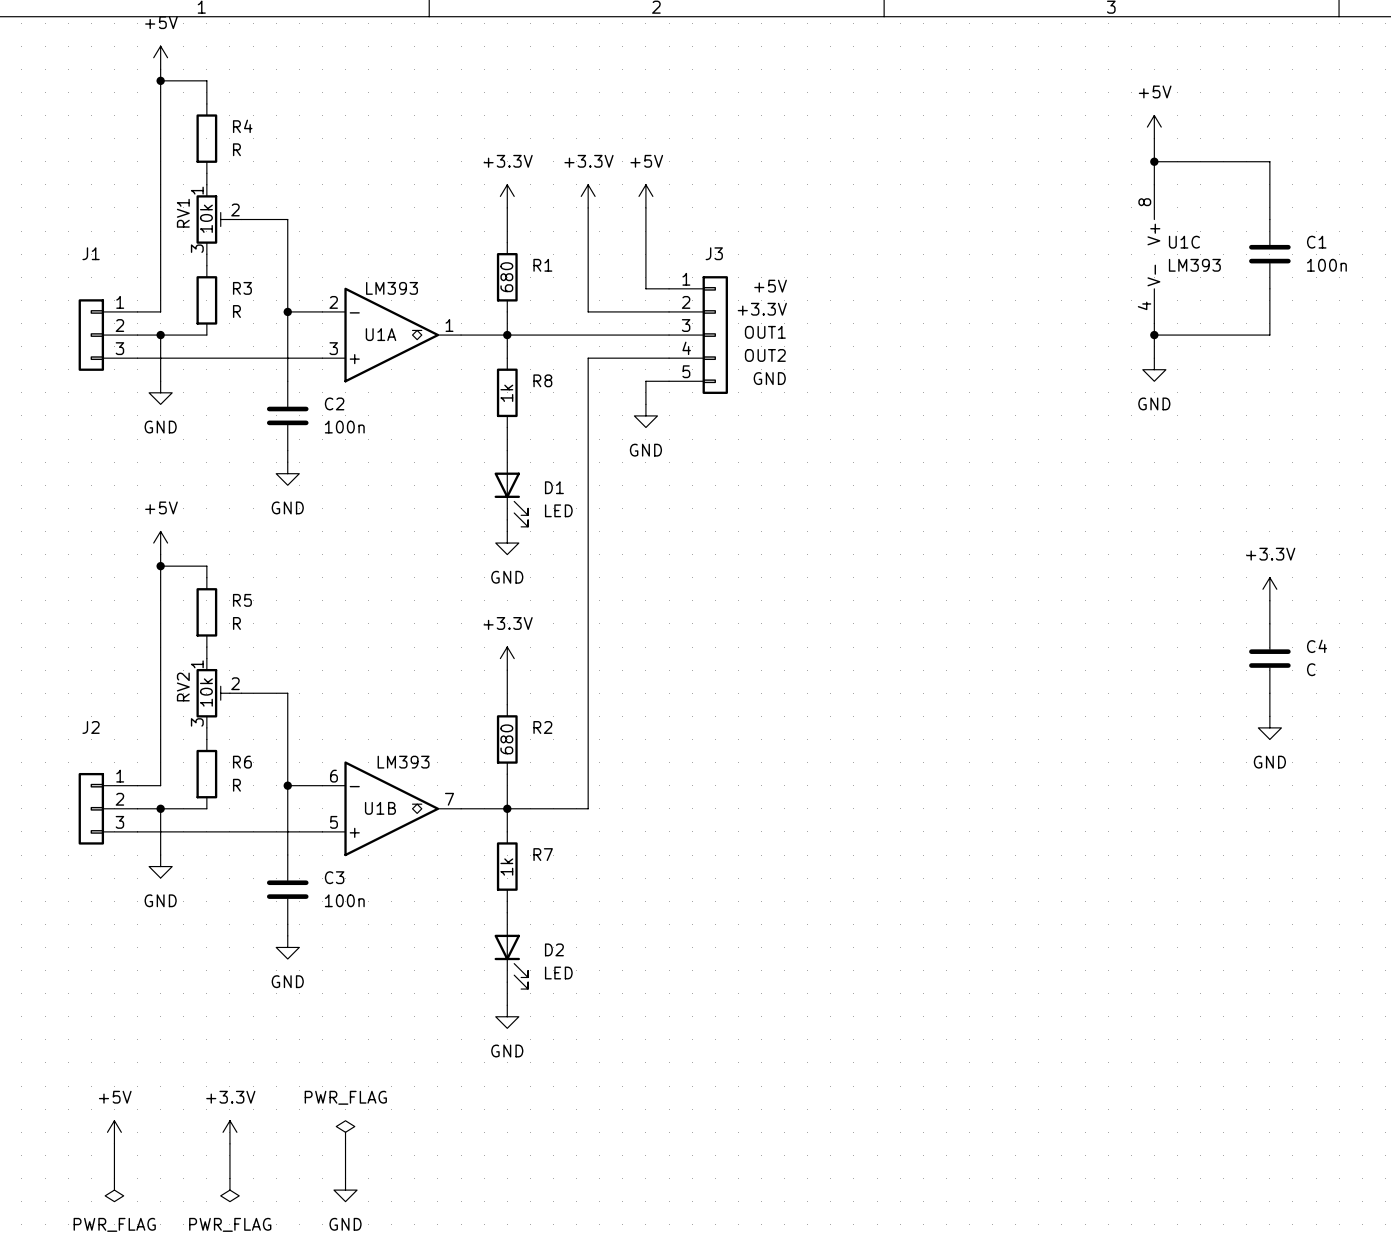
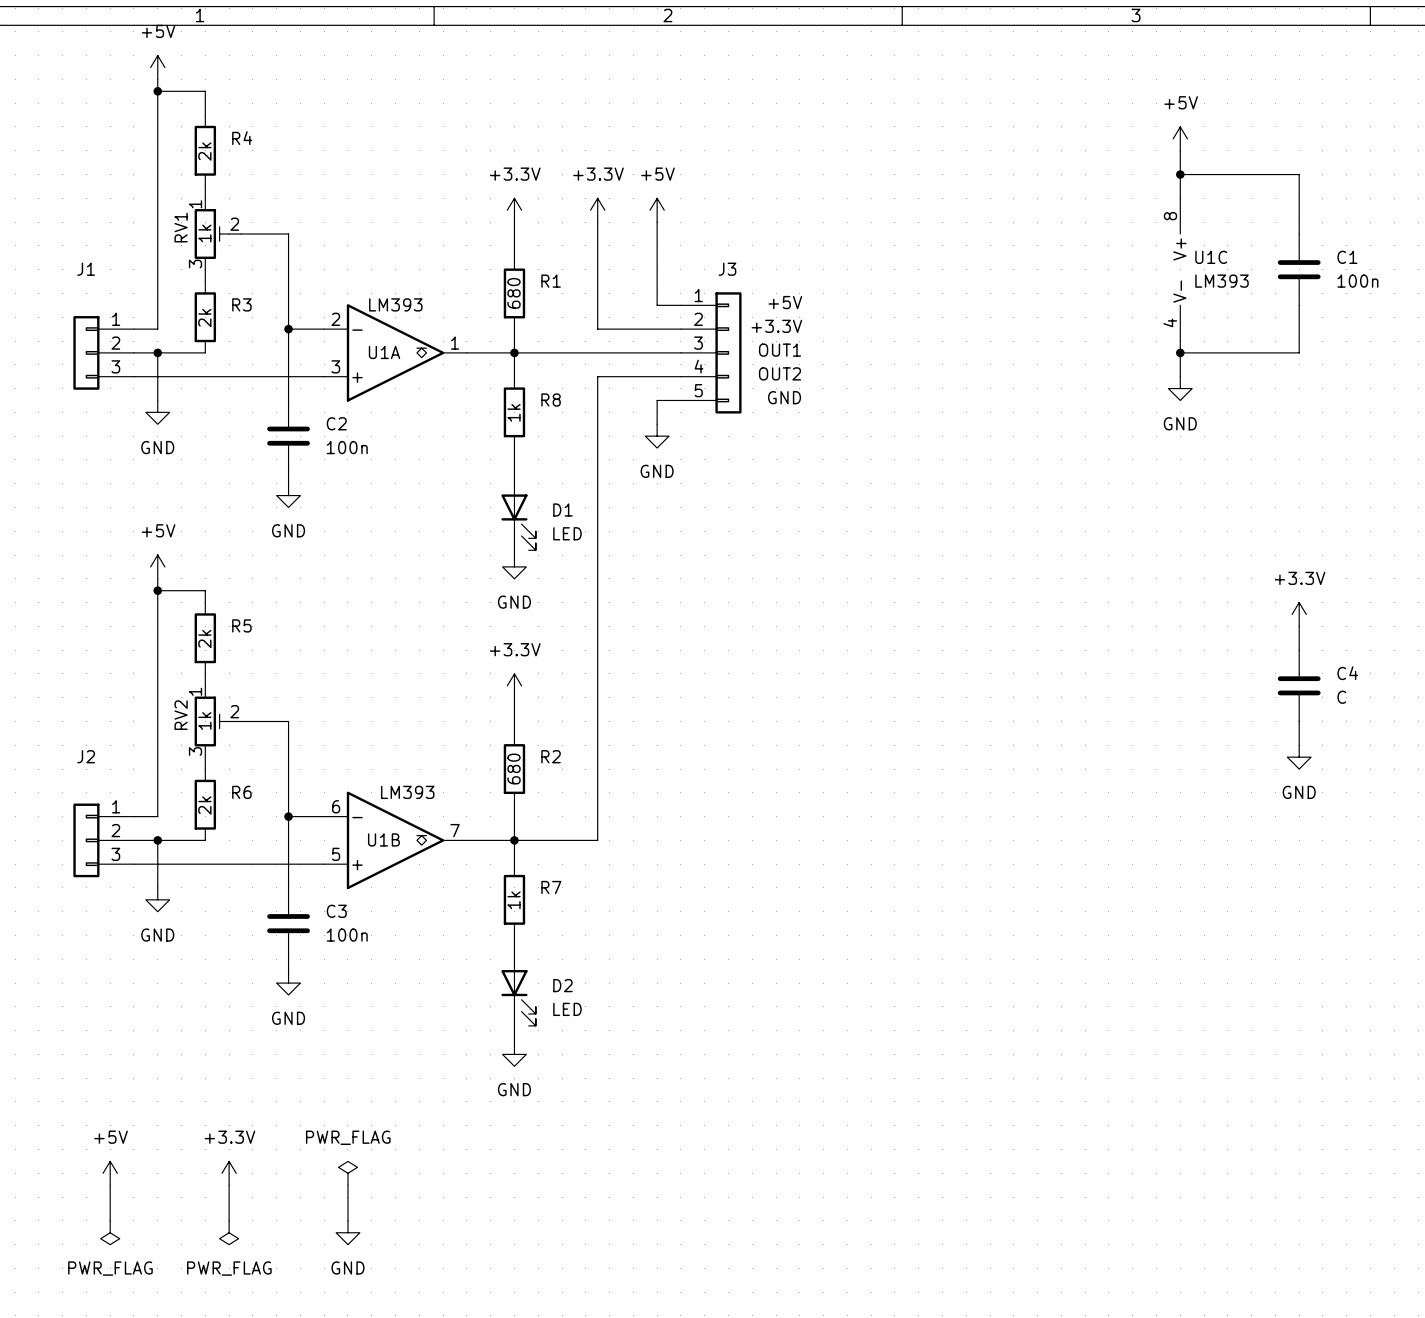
R4 value: R (236, 149) -> 2k (204, 151)
RV1 value: 10k (206, 218) -> 1k (204, 233)
R3 value: R (236, 311) -> 2k (204, 317)
R5 value: R (236, 623) -> 2k (204, 639)
RV2 value: 10k (206, 692) -> 1k (204, 721)
R6 value: R (236, 785) -> 2k (204, 805)

